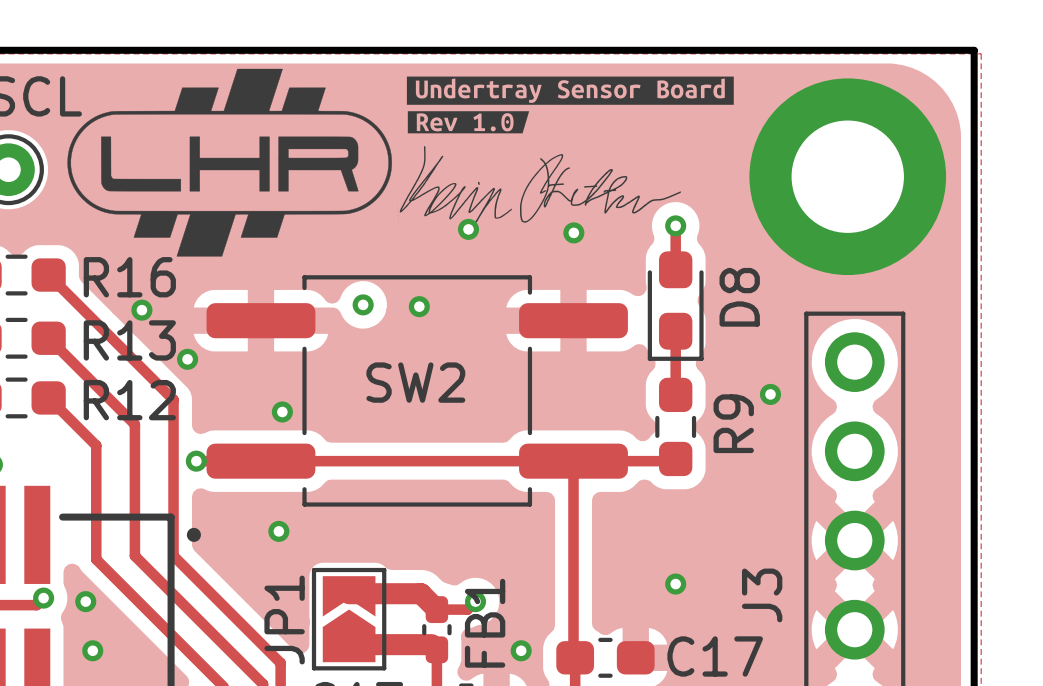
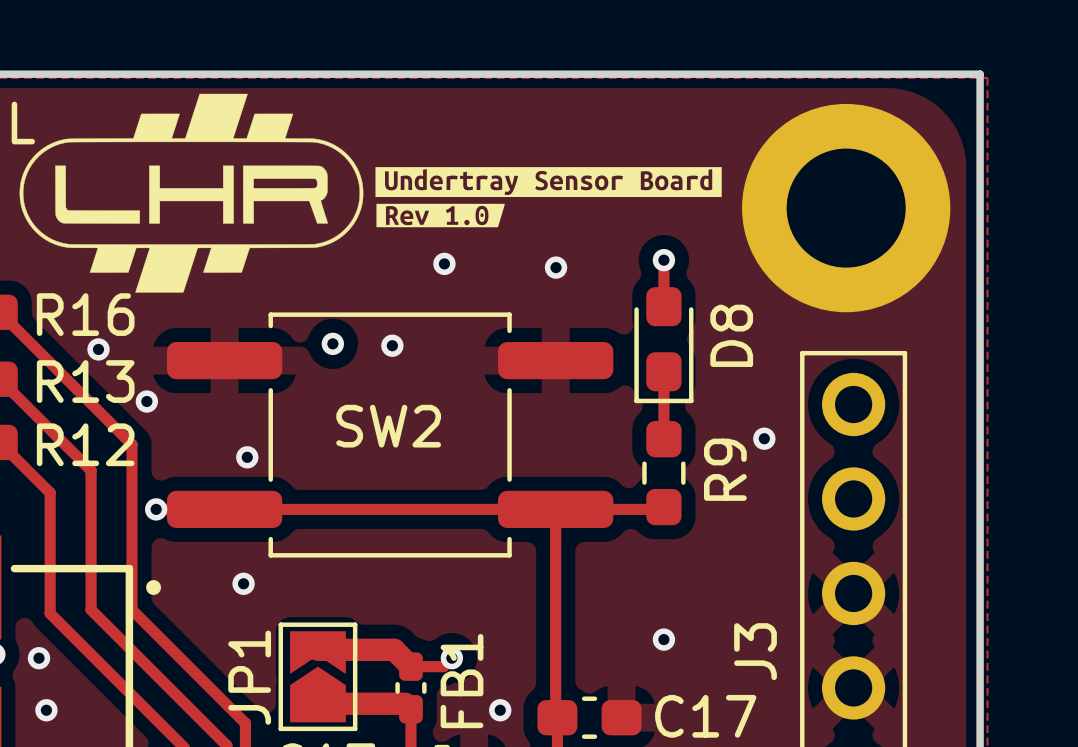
drawing position: (570, 90) -> (548, 182)
drawing position: (468, 122) -> (440, 215)
drawing: [397, 146, 681, 224] -> none

